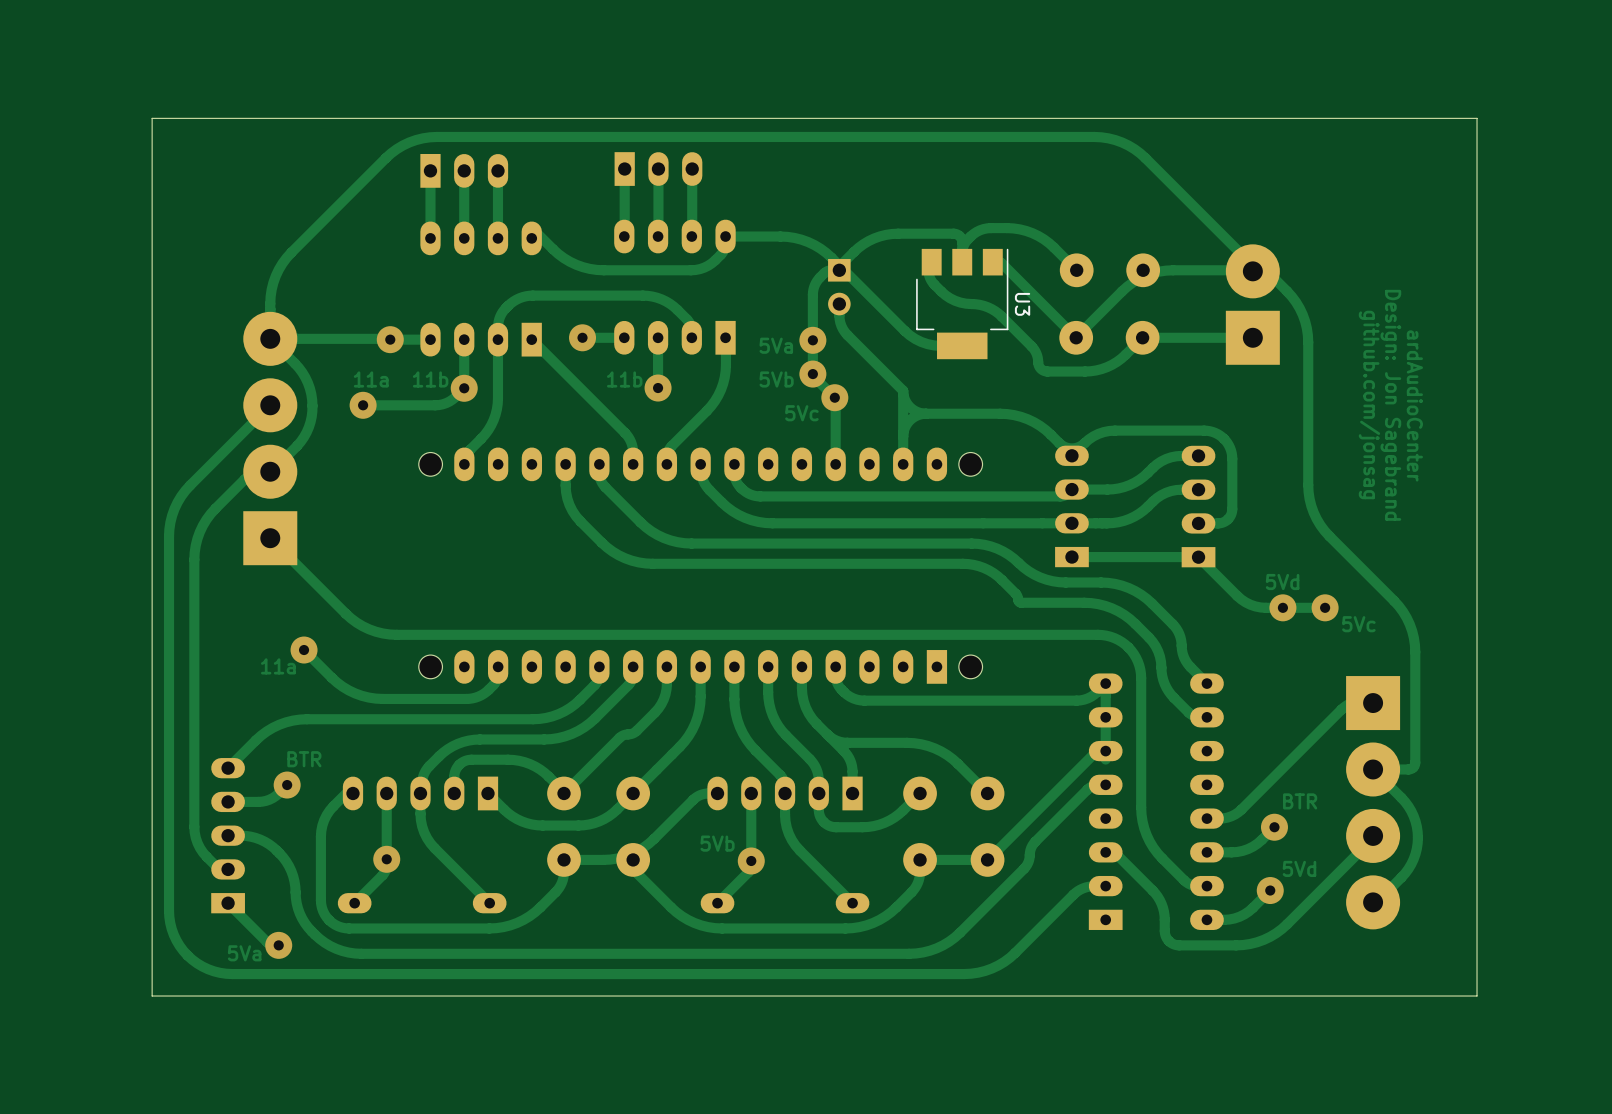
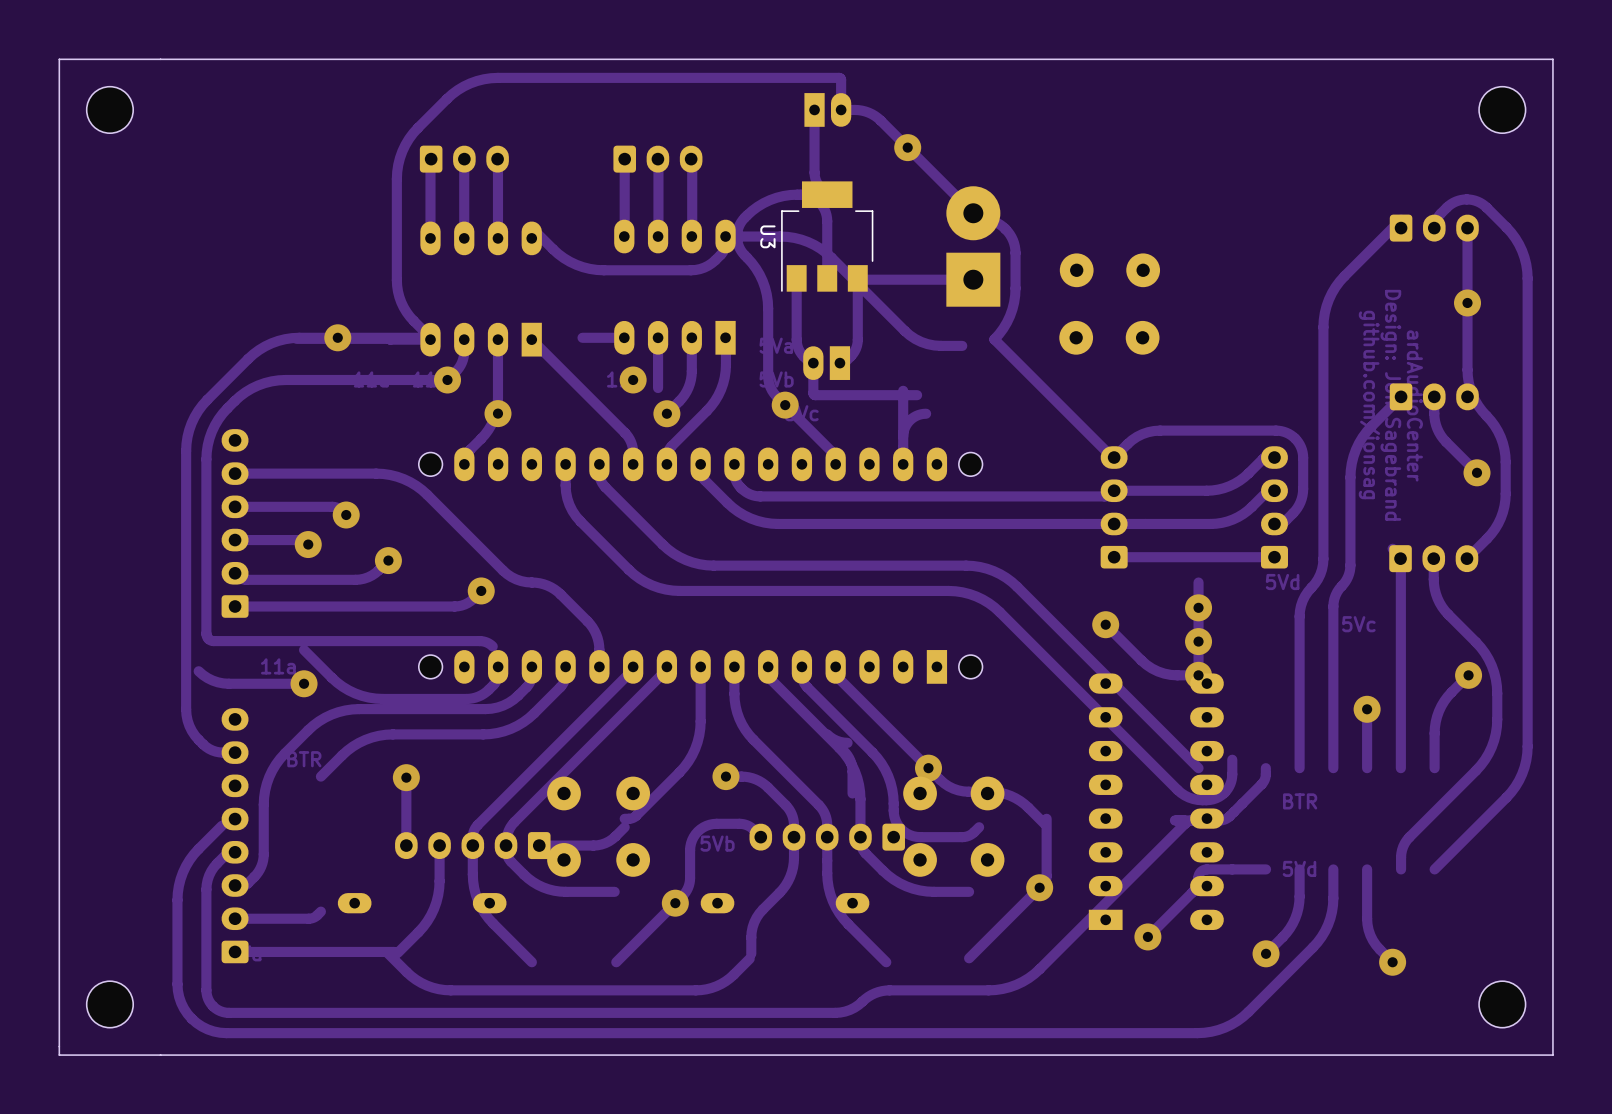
part: none -> (109, 109)
track: none -> (814, 109) (814, 175) (817, 183) (827, 194)
part: none -> (827, 109)
track: none -> (839, 109) (862, 110) (878, 118) (973, 213)
track: none -> (841, 109) (841, 79) (839, 77) (498, 77) (477, 81) (457, 90) (418, 127) (402, 151) (397, 171) (397, 285) (399, 296) (406, 312) (428, 335) (428, 335) (428, 335) (429, 335) (429, 335) (430, 335) (427, 337) (292, 338) (271, 343) (253, 354) (207, 399) (198, 410) (189, 429) (186, 450) (186, 715) (191, 731) (205, 746) (215, 751) (235, 752)
part: none -> (1502, 109)
board edge: (1477, 118) (152, 118) (152, 996) (1477, 996) (1477, 118) -> (1552, 59) (1552, 1055) (59, 1055) (59, 59) (1552, 59)
via: none -> (907, 147)
part footprint: [614, 152, 703, 186] -> [613, 145, 703, 173]
part footprint: [420, 154, 509, 188] -> [419, 145, 509, 173]
track: none -> (1401, 219) (1339, 281) (1328, 299) (1324, 313) (1323, 558) (1320, 574) (1305, 596) (1299, 611) (1299, 768)
part: none -> (1434, 228)
track: none -> (1468, 228) (1468, 382) (1475, 400) (1494, 425) (1500, 437) (1505, 462) (1505, 500) (1500, 518) (1491, 534) (1468, 557)
track: none -> (1434, 236) (1436, 220) (1448, 205) (1461, 199) (1474, 200) (1484, 205) (1511, 232) (1519, 244) (1526, 264) (1527, 746) (1524, 767) (1511, 792) (1434, 869)
track: (962, 253) (966, 241) (980, 230) (991, 228) (1013, 228) (1026, 230) (1043, 239) (1076, 270) -> none
track: (928, 261) (930, 278) (941, 291) (955, 300) (983, 305) (998, 313) (1033, 348) (1037, 355) (1038, 365) (1043, 370) (1085, 371) (1101, 369) (1121, 358) (1142, 337) -> none
track: (996, 261) (1001, 263) (1076, 337) -> none
track: (962, 262) (962, 240) (956, 234) (891, 234) (874, 238) (863, 244) (836, 269) (826, 271) (817, 281) (812, 294) (812, 375) (835, 398) (835, 459) -> (827, 278) (827, 218) (823, 207) (814, 198) (800, 194) (776, 197) (757, 206) (741, 222) (737, 233) (738, 245) (759, 274) (766, 294) (768, 376) (770, 387) (776, 396) (833, 453) (835, 459)
track: (1249, 270) (1246, 258) (1145, 158) (1128, 145) (1108, 138) (436, 136) (409, 142) (391, 153) (291, 252) (275, 275) (271, 289) (270, 309) -> none
track: (1252, 270) (1166, 270) (1145, 275) (1127, 286) (1075, 337) -> none
track: (1266, 270) (1296, 302) (1306, 328) (1308, 485) (1313, 512) (1329, 536) (1398, 606) (1409, 624) (1413, 637) (1415, 764) (1410, 769) (1389, 769) (1384, 777) (1385, 782) (1411, 811) (1416, 826) (1417, 843) (1413, 859) (1408, 868) (1375, 903) -> none
track: none -> (796, 278) (796, 342) (799, 351) (810, 363)
track: none -> (857, 278) (857, 342) (854, 351) (844, 363)
track: none -> (860, 278) (973, 279)
part: (839, 287) -> none
via: none -> (1467, 302)
U3 rotation: 0° (962, 303) -> 180° (827, 236)
U3 position: (962, 303) -> (827, 236)
track: (839, 304) (840, 322) (845, 332) (903, 390) (907, 404) (917, 411) (1014, 415) (1034, 422) (1061, 444) (1069, 448) (1078, 447) (1093, 436) (1109, 430) (1160, 430) -> (970, 219) (989, 220) (1000, 224) (1009, 234) (1014, 246) (1014, 302) (1006, 322) (994, 339) (1112, 457) (1137, 436) (1148, 432) (1160, 430)
part position: (1252, 304) -> (973, 246)
via: none -> (337, 337)
via: (582, 337) -> none
track: (691, 337) (689, 323) (673, 306) (661, 299) (642, 295) (522, 297) (510, 303) (502, 312) (498, 321) (498, 337) -> (691, 337) (689, 383) (682, 398) (666, 413)
track: (1252, 337) (1143, 337) -> none
via: (390, 339) -> none
via: (812, 340) -> none
track: (464, 351) (464, 388) (449, 401) (435, 405) (363, 405) -> (464, 351) (460, 364) (447, 379) (278, 380) (251, 388) (227, 408) (211, 431) (206, 452) (206, 634) (208, 638) (213, 641) (479, 641) (492, 646)
track: (285, 354) (302, 372) (309, 388) (312, 411) (306, 432) (297, 445) (274, 468) (246, 477) (215, 508) (202, 525) (194, 552) (194, 832) (200, 848) (206, 856) (218, 868) (228, 869) -> none
track: none -> (813, 363) (814, 395) (917, 395)
part: none -> (826, 363)
via: (812, 374) -> none
via: none -> (633, 379)
via position: (464, 388) -> (447, 379)
via: (658, 388) -> none
track: none -> (1401, 396) (1362, 437) (1351, 463) (1350, 568) (1346, 579) (1335, 595) (1333, 606) (1333, 768)
track: none -> (1434, 396) (1434, 417) (1439, 432) (1477, 472)
part: none -> (1434, 396)
via: (834, 397) -> none
track: (270, 405) (185, 490) (174, 508) (169, 529) (169, 916) (171, 929) (179, 945) (187, 955) (202, 966) (214, 971) (232, 974) (971, 973) (991, 968) (1010, 957) (1077, 891) (1088, 886) (1105, 886) -> none
via: (363, 405) -> none
via: none -> (785, 405)
via: none -> (497, 413)
via: none -> (666, 413)
track: (1204, 430) (1219, 435) (1227, 443) (1231, 450) (1232, 511) (1228, 519) (1221, 522) (1190, 523) -> (1204, 430) (1278, 430) (1288, 433) (1296, 440) (1303, 455) (1301, 498) (1297, 508) (1285, 520) (1274, 523)
part: (270, 438) -> none
track: (1198, 455) (1176, 456) (1166, 459) (1139, 479) (1124, 487) (1113, 489) (1075, 489) (1060, 496) -> (1274, 455) (1265, 457) (1239, 480) (1218, 489) (1118, 490) (1105, 496) (1060, 496)
track: (700, 468) (701, 476) (706, 487) (726, 507) (744, 517) (772, 523) (1113, 523) (1134, 516) (1166, 492) (1176, 490) (1198, 489) -> (700, 468) (703, 478) (738, 511) (757, 520) (778, 523) (1216, 523) (1238, 517) (1247, 510) (1267, 491) (1274, 489)
via: none -> (1477, 472)
track: none -> (235, 506) (333, 506) (340, 509) (346, 515)
part: (1071, 506) -> none
part: (1198, 506) -> none
part: none -> (1114, 507)
part: none -> (1274, 507)
via: none -> (346, 515)
track: (640, 522) (663, 538) (684, 543) (971, 543) (991, 546) (1008, 554) (1028, 571) (1046, 579) (1059, 582) (1115, 583) (1141, 594) (1176, 628) (1185, 660) (1206, 683) -> (640, 522) (673, 553) (692, 562) (706, 565) (966, 565) (993, 571) (1017, 586) (1198, 768)
part: none -> (235, 523)
track: (270, 538) (351, 618) (369, 629) (389, 634) (1097, 634) (1114, 638) (1131, 650) (1140, 669) (1141, 807) (1146, 835) (1157, 853) (1186, 882) (1193, 885) (1206, 886) -> none
track: none -> (235, 540) (301, 540) (308, 544)
track: (601, 542) (618, 555) (645, 563) (962, 563) (978, 566) (997, 576) (1016, 594) (1020, 602) (1091, 603) (1111, 608) (1124, 614) (1155, 646) (1159, 656) (1163, 680) (1171, 694) (1192, 715) (1206, 717) -> (601, 542) (639, 578) (652, 585) (672, 590) (948, 590) (969, 594) (988, 603) (999, 612) (1184, 795) (1193, 799) (1206, 800) (1222, 794) (1231, 781) (1232, 759)
via: none -> (308, 544)
track: none -> (1392, 548) (1399, 556) (1400, 562) (1400, 768)
track: (1071, 557) (1198, 557) (1237, 595) (1250, 604) (1266, 607) (1325, 607) -> none
track: none -> (1274, 557) (1114, 557)
track: none -> (1433, 558) (1433, 584) (1439, 602) (1448, 614) (1480, 647) (1491, 665) (1496, 686) (1496, 726) (1491, 747) (1480, 765) (1407, 840) (1402, 850) (1401, 869)
part: none -> (1433, 558)
track: none -> (388, 560) (371, 575) (359, 579) (246, 579) (240, 578) (235, 573)
via: none -> (388, 560)
track: none -> (1198, 582) (1198, 675) (1170, 674) (1151, 668) (1105, 624)
track: none -> (481, 590) (467, 602) (454, 606) (235, 606)
via: none -> (481, 590)
via: none -> (1198, 607)
via: (1282, 607) -> none
via: (1325, 607) -> none
via: none -> (1105, 624)
via: none -> (1198, 641)
via position: (304, 650) -> (304, 683)
track: none -> (531, 666) (531, 677) (527, 685) (513, 699) (497, 707) (352, 709) (331, 714) (313, 725) (284, 753) (272, 770) (264, 797) (262, 863) (258, 872) (247, 883) (236, 886)
track: none -> (565, 666) (565, 677) (561, 685) (529, 717) (510, 728) (490, 734) (392, 734) (372, 737) (347, 750) (320, 776)
track: (599, 666) (598, 678) (594, 685) (569, 708) (552, 716) (533, 719) (292, 720) (266, 731) (228, 768) -> (599, 666) (599, 646) (594, 630) (560, 594) (547, 585) (521, 581) (507, 574) (427, 494) (410, 482) (397, 476) (376, 473) (235, 473)
track: (633, 668) (632, 676) (629, 683) (595, 718) (578, 730) (551, 739) (474, 739) (457, 743) (443, 752) (427, 768) (423, 777) (422, 793) -> (633, 668) (477, 824) (473, 832) (472, 844)
track: (666, 668) (665, 694) (658, 708) (635, 731) (620, 737) (564, 793) -> (666, 668) (512, 824) (507, 834) (506, 852)
track: none -> (198, 671) (207, 678) (223, 683) (304, 683)
track: (768, 671) (768, 698) (772, 715) (782, 730) (815, 766) (818, 777) (818, 812) (825, 823) (836, 827) (868, 826) (879, 824) (898, 814) (920, 793) -> (768, 671) (771, 680) (839, 747) (851, 764) (860, 791) (860, 837)
track: (835, 671) (836, 680) (839, 687) (850, 696) (860, 700) (1076, 700) (1087, 698) (1102, 690) (1105, 695) (1105, 759) -> (835, 671) (838, 678) (944, 783) (963, 791) (995, 792) (1010, 795) (1024, 804) (1044, 823)
track: (801, 674) (802, 694) (808, 713) (844, 751) (843, 745) (847, 742) (906, 742) (927, 745) (952, 759) (987, 793) -> (801, 674) (807, 687) (881, 763) (892, 789) (894, 817) (904, 831) (916, 836) (962, 837) (970, 834) (979, 827)
via: none -> (1198, 675)
track: none -> (1468, 675) (1447, 696) (1439, 711) (1434, 727) (1434, 768)
via: none -> (1468, 675)
track: (734, 693) (735, 713) (742, 733) (750, 745) (783, 780) (785, 821) (791, 840) (852, 903) -> (734, 693) (739, 718) (749, 734) (823, 811) (827, 822) (827, 880) (832, 900) (843, 919) (886, 962)
track: (700, 696) (697, 717) (684, 741) (617, 809) (599, 821) (578, 825) (542, 825) (526, 823) (508, 813) (488, 793) -> (700, 696) (699, 735) (688, 761) (636, 815) (624, 818)
track: (1375, 700) (1357, 701) (1343, 707) (1238, 812) (1227, 817) (1206, 818) -> none
track: none -> (1367, 709) (1367, 768)
via: none -> (1367, 709)
track: (1105, 751) (1093, 754) (987, 860) -> none
part footprint: [211, 758, 245, 914] -> [221, 708, 249, 964]
via: none -> (928, 768)
track: none -> (1265, 768) (1265, 776) (1262, 783) (1226, 818) (1174, 820)
track: none -> (725, 776) (748, 777) (762, 782) (787, 807) (793, 822) (794, 857) (791, 872) (782, 889) (756, 917) (751, 932) (751, 953)
via: none -> (725, 776)
track: none -> (406, 777) (406, 845)
via: none -> (406, 777)
track: (1105, 784) (1095, 785) (1088, 788) (1035, 841) (1031, 847) (1025, 866) (954, 937) (936, 948) (916, 953) (348, 952) (324, 942) (304, 923) (297, 908) (291, 871) (276, 850) (255, 837) (219, 835) -> none
track: (287, 785) (275, 795) (265, 800) (228, 801) -> none
via: (287, 785) -> none
track: (346, 793) (326, 815) (320, 836) (321, 907) (329, 920) (341, 927) (489, 928) (510, 925) (535, 912) (557, 890) (563, 877) (564, 859) -> none
track: (386, 793) (386, 869) (354, 903) -> none
track: (420, 793) (420, 820) (427, 838) (489, 903) -> none
part: (420, 793) -> none
track: (565, 793) (544, 772) (535, 766) (519, 760) (508, 759) (469, 759) (461, 762) (454, 772) (454, 793) -> none
track: (717, 793) (704, 793) (696, 797) (649, 843) (630, 854) (610, 859) (557, 860) -> none
track: (751, 793) (750, 867) (717, 903) -> none
part: (785, 793) -> none
part: (1373, 802) -> none
track: none -> (1046, 818) (1045, 881) (969, 958)
track: none -> (1185, 823) (1039, 969) (1022, 981) (995, 990) (882, 991) (871, 994) (849, 1009) (835, 1012) (223, 1012) (213, 1006) (206, 993) (206, 889) (211, 871) (228, 852)
track: none -> (221, 825) (193, 854) (180, 879) (177, 900) (177, 984) (181, 1002) (191, 1018) (207, 1029) (226, 1033) (1204, 1032) (1225, 1027) (1243, 1016) (1317, 942) (1328, 924) (1332, 911) (1333, 869)
track: none -> (624, 827) (612, 839) (601, 844) (539, 845)
track: (1274, 827) (1257, 843) (1248, 849) (1237, 851) (1206, 852) -> none
via: (1274, 827) -> none
track: none -> (759, 835) (750, 827) (741, 823) (713, 824) (697, 831) (690, 843) (689, 880) (685, 891) (616, 962)
track: none -> (860, 835) (861, 846) (864, 851) (888, 875) (899, 883) (926, 891) (969, 891)
track: (1375, 835) (1281, 928) (1263, 939) (1243, 945) (1179, 945) (1170, 942) (1165, 934) (1163, 911) (1157, 896) (1116, 854) (1105, 852) -> none
part: none -> (827, 837)
track: none -> (439, 845) (439, 888) (434, 908) (423, 927) (397, 952)
track: none -> (472, 845) (473, 881) (481, 907) (493, 923) (531, 962)
part: none -> (472, 845)
track: none -> (506, 850) (511, 861) (528, 878) (543, 887) (559, 891) (614, 891)
via: (386, 859) -> none
track: (920, 859) (919, 874) (916, 885) (896, 907) (873, 922) (845, 928) (722, 928) (701, 925) (681, 916) (671, 907) (635, 871) (633, 860) -> none
track: (987, 859) (920, 860) -> none
via: (751, 860) -> none
track: none -> (1266, 869) (1202, 870) (1199, 874) (1193, 891) (1147, 936)
track: none -> (1299, 869) (1299, 902) (1295, 918) (1286, 932) (1266, 953)
track: none -> (1367, 869) (1368, 929) (1376, 945) (1392, 962)
track: (1274, 886) (1244, 914) (1229, 919) (1206, 919) -> none
via: none -> (1039, 887)
via: (1270, 890) -> none
track: (228, 903) (268, 943) (278, 945) -> none
via: none -> (675, 903)
track: none -> (320, 911) (309, 918) (235, 918)
via: none -> (1147, 936)
via: (278, 945) -> none
track: none -> (235, 951) (395, 952)
track: none -> (388, 953) (411, 976) (421, 982) (438, 989) (450, 990) (701, 990) (716, 986) (725, 981) (749, 958)
via: none -> (1266, 953)
via: none -> (1392, 962)
part: none -> (109, 1004)
part: none -> (1502, 1004)

